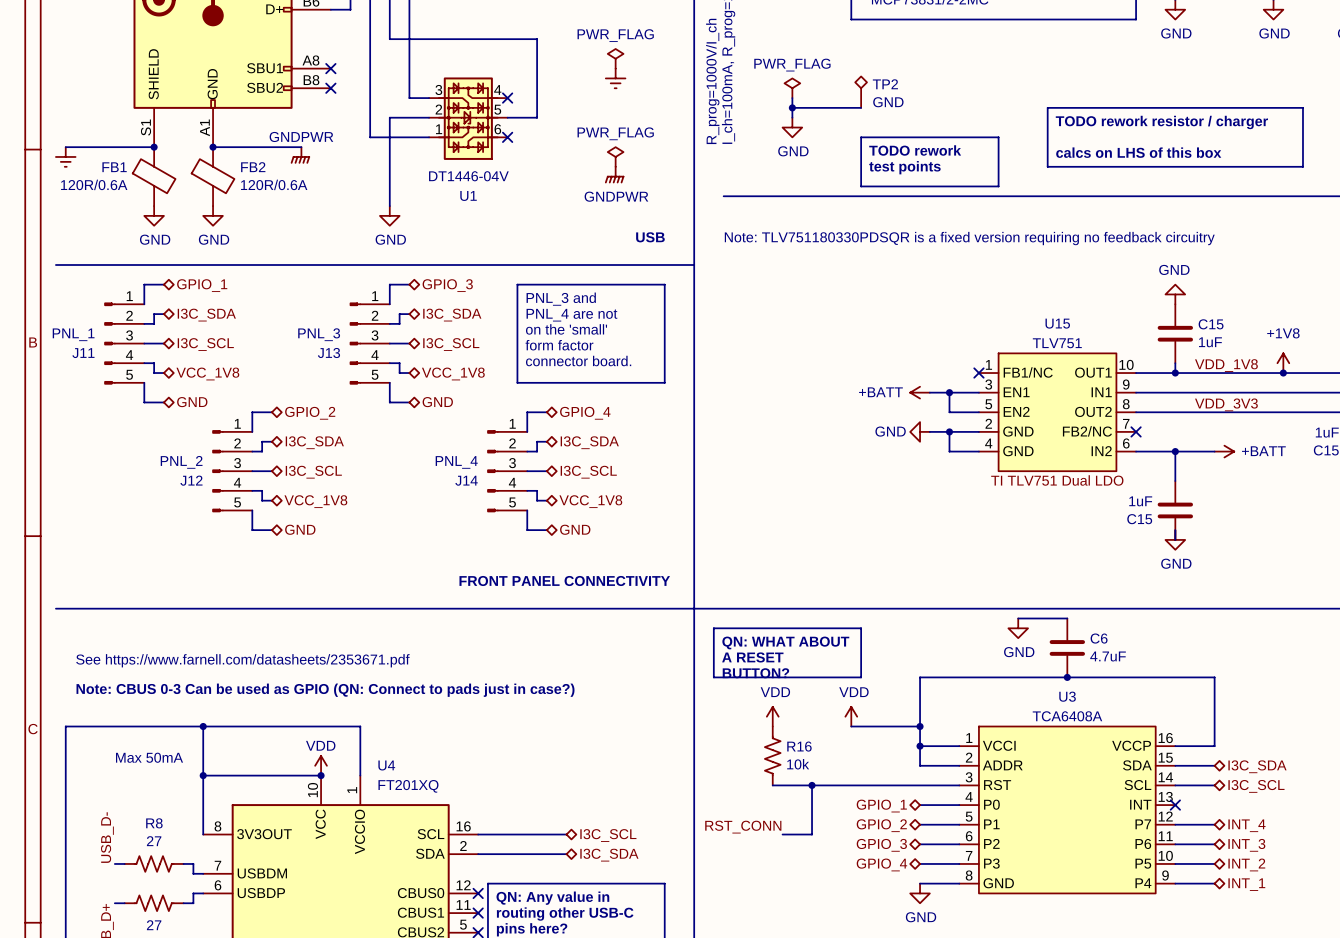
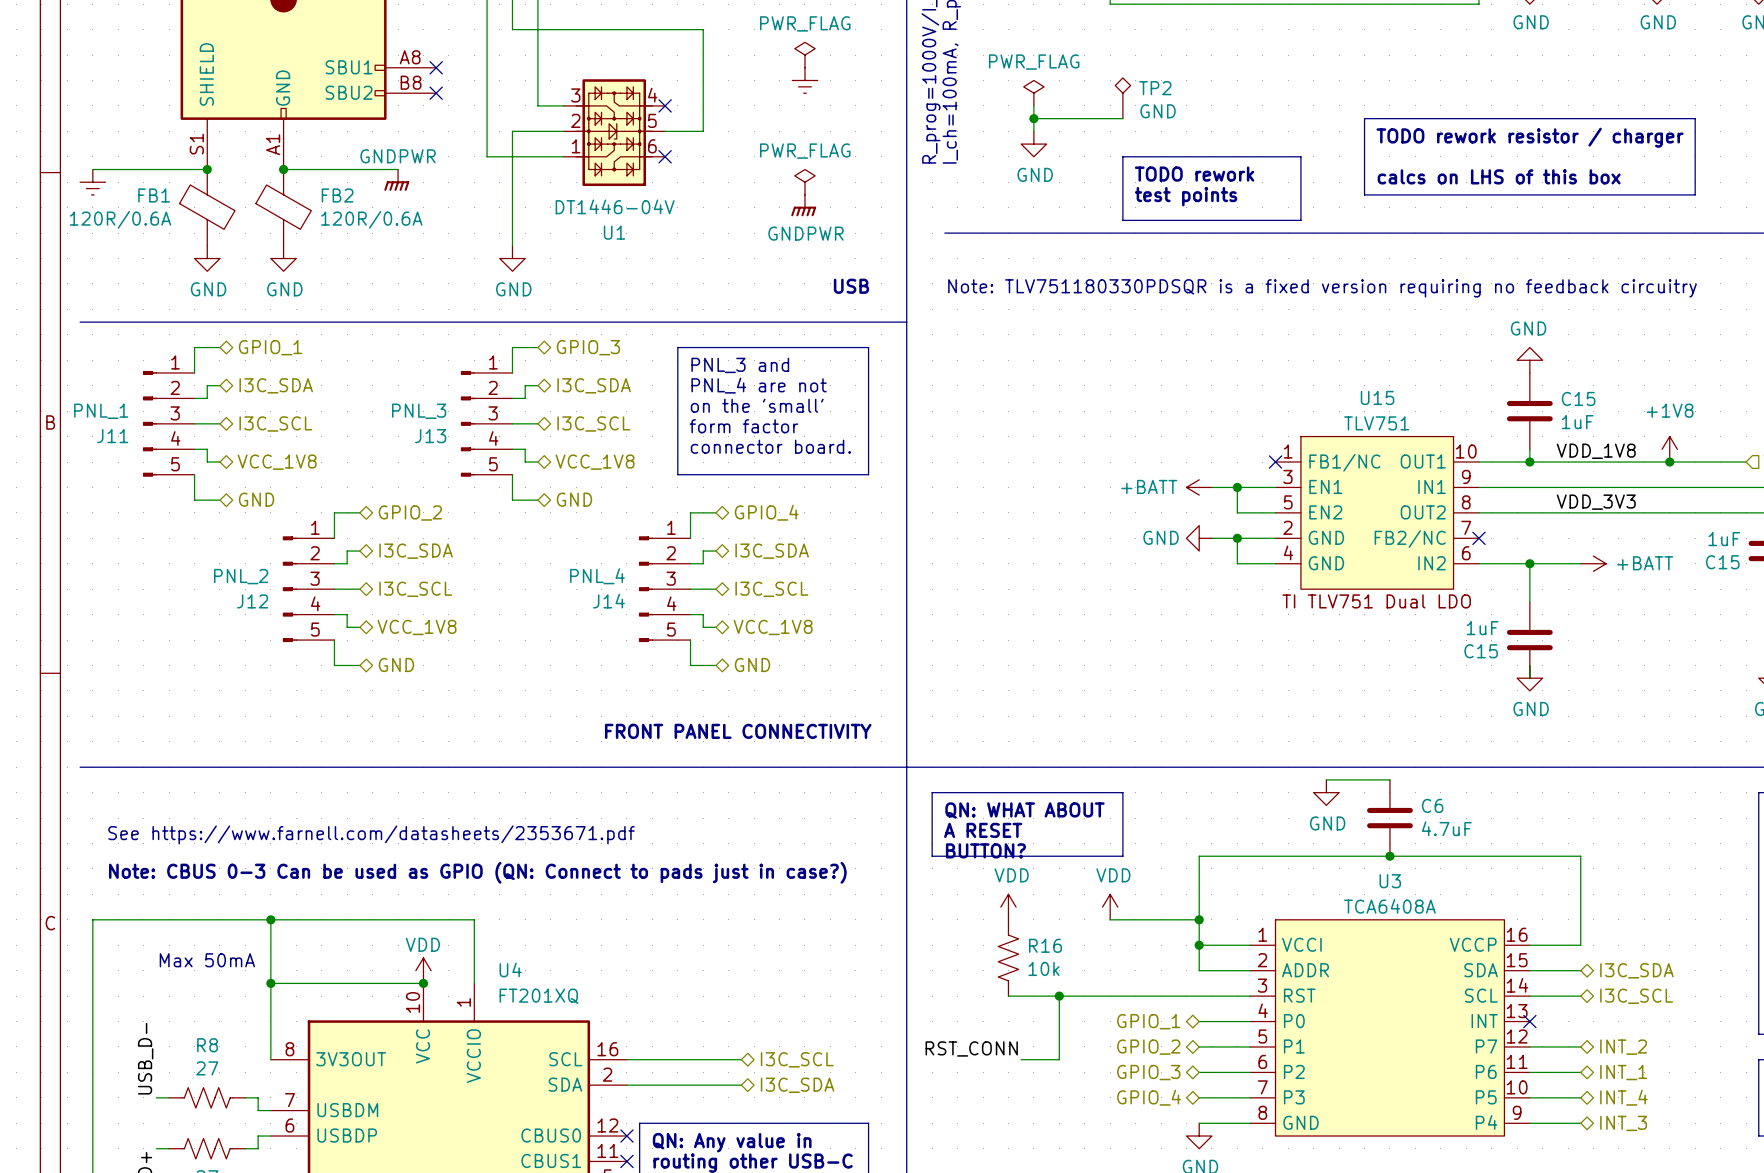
hierarchical label: INT_4 (1246, 825) -> INT_2 (1623, 1047)
hierarchical label: INT_3 (1246, 845) -> INT_1 (1623, 1072)
hierarchical label: INT_2 (1246, 864) -> INT_4 (1623, 1097)
hierarchical label: INT_1 (1246, 884) -> INT_3 (1623, 1123)

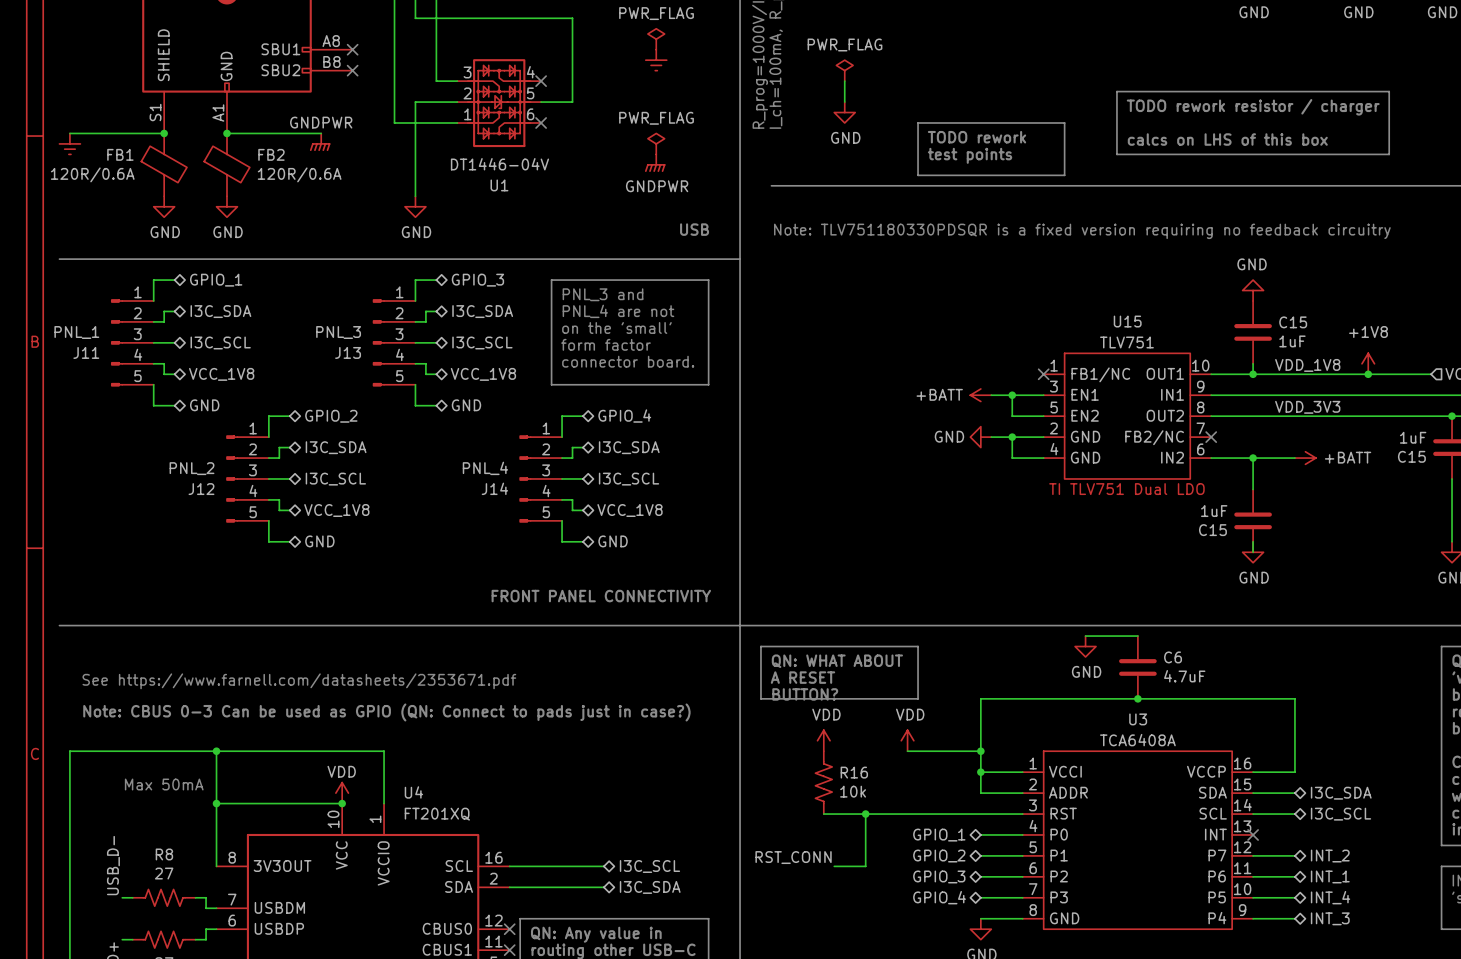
TP2: GND (1122, 98) -> none
wire: (1033, 118) (1122, 118) -> none
junction: (1033, 118) -> none

